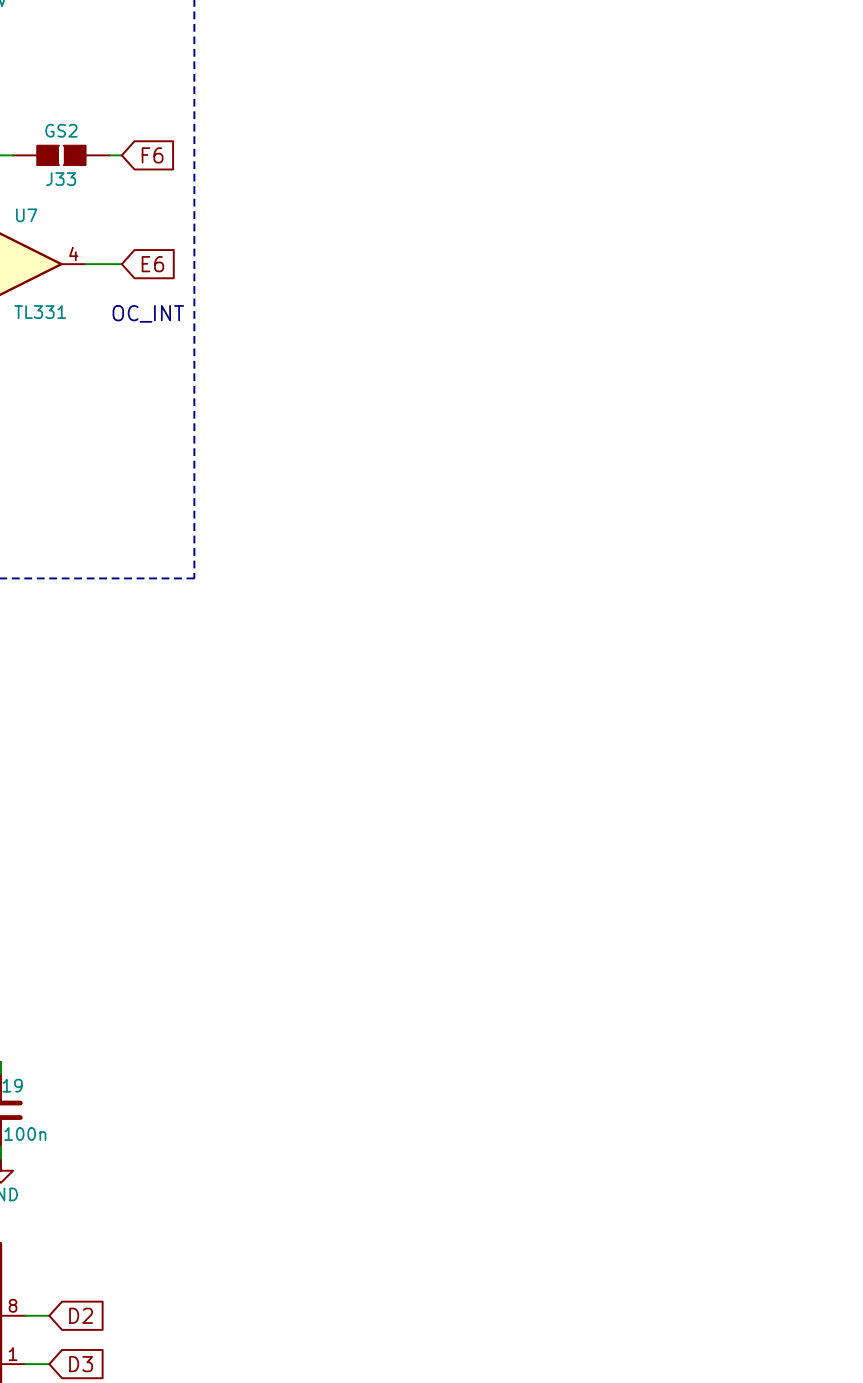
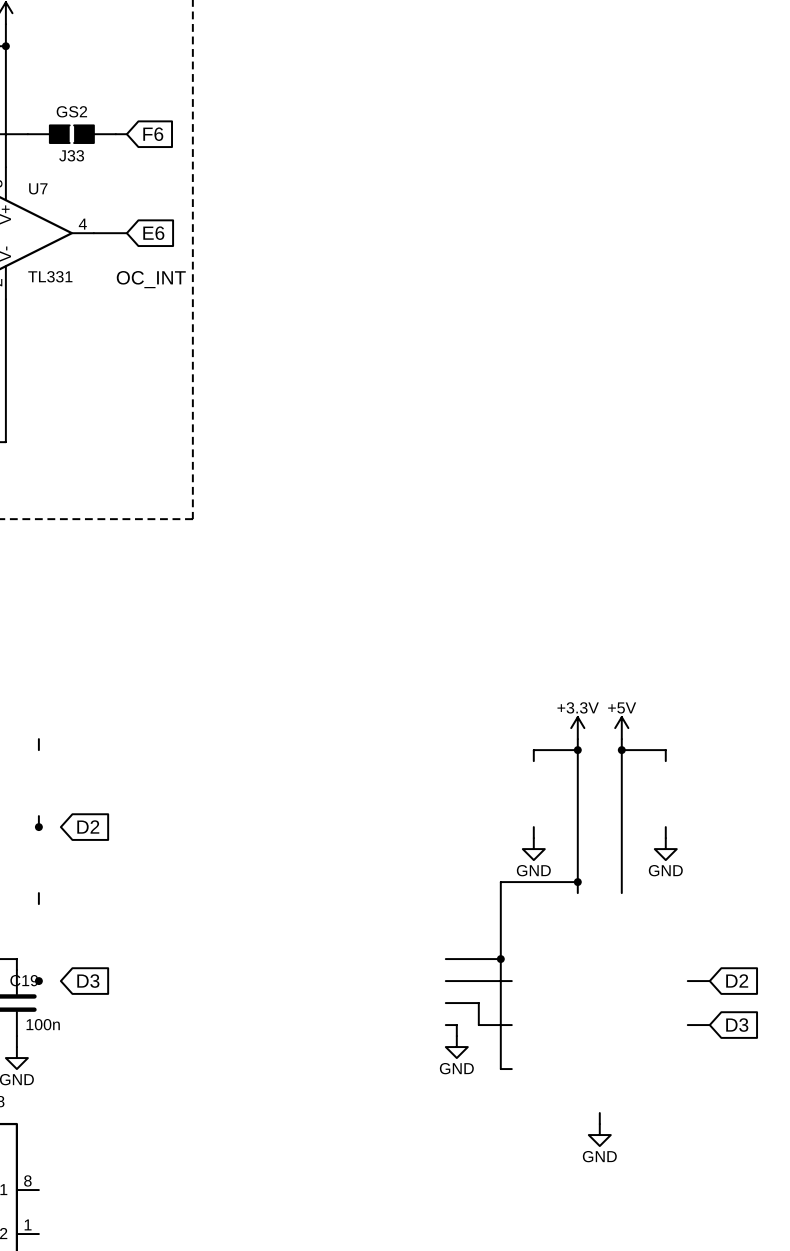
power symbol: none -> +3.3V (577, 728)
power symbol: none -> +5V (621, 728)
wire: none -> (38, 739) (38, 750)
wire: none -> (577, 739) (577, 893)
wire: none -> (621, 739) (621, 893)
wire: none -> (577, 750) (533, 750) (533, 761)
junction: none -> (577, 750)
wire: none -> (621, 750) (665, 750) (665, 761)
junction: none -> (621, 750)
wire: none -> (38, 816) (38, 827)
junction: none -> (38, 827)
global label: none -> D2 (88, 826)
wire: none -> (533, 827) (533, 838)
wire: none -> (665, 827) (665, 838)
power symbol: none -> GND (533, 849)
power symbol: none -> GND (665, 849)
wire: none -> (577, 882) (500, 882) (500, 1069) (511, 1069)
junction: none -> (577, 882)
wire: none -> (38, 893) (38, 904)
wire: none -> (445, 959) (500, 959)
junction: none -> (500, 959)
junction: none -> (38, 981)
global label: none -> D3 (88, 981)
wire: none -> (445, 981) (511, 981)
wire: none -> (687, 981) (709, 981)
global label: none -> D2 (737, 980)
wire: none -> (445, 1003) (478, 1003) (478, 1025) (511, 1025)
wire: none -> (445, 1025) (456, 1025) (456, 1036)
wire: none -> (687, 1025) (709, 1025)
global label: none -> D3 (737, 1025)
power symbol: none -> GND (456, 1047)
wire: none -> (599, 1113) (599, 1124)
power symbol: none -> GND (599, 1135)
wire: (25, 1315) (49, 1315) -> none
global label: D2 (81, 1315) -> none
wire: (25, 1364) (49, 1364) -> none
global label: D3 (81, 1364) -> none

